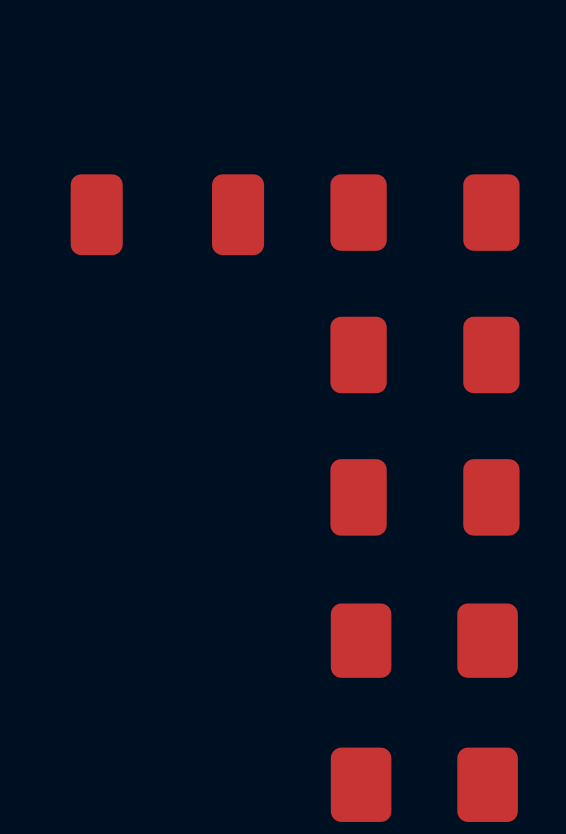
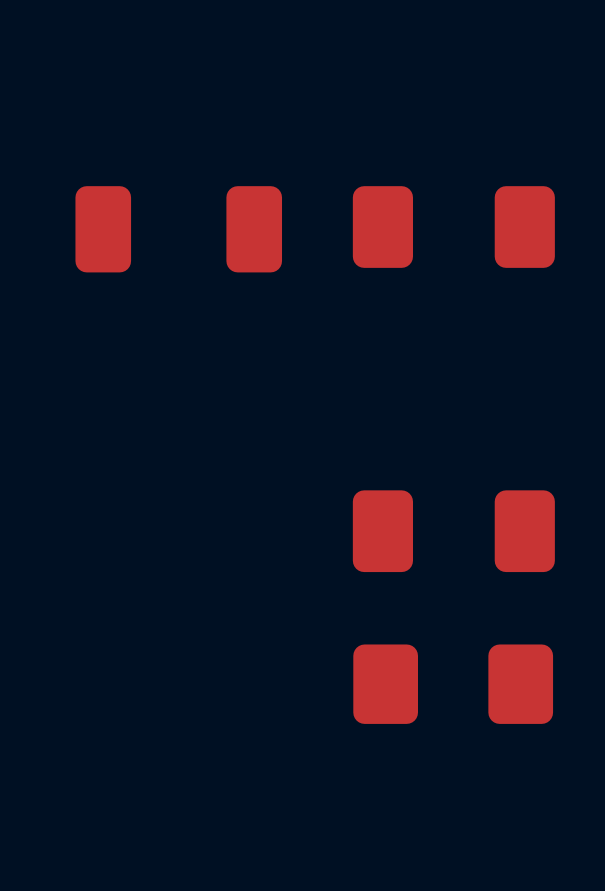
part: (424, 354) -> none
part: (424, 784) -> none

